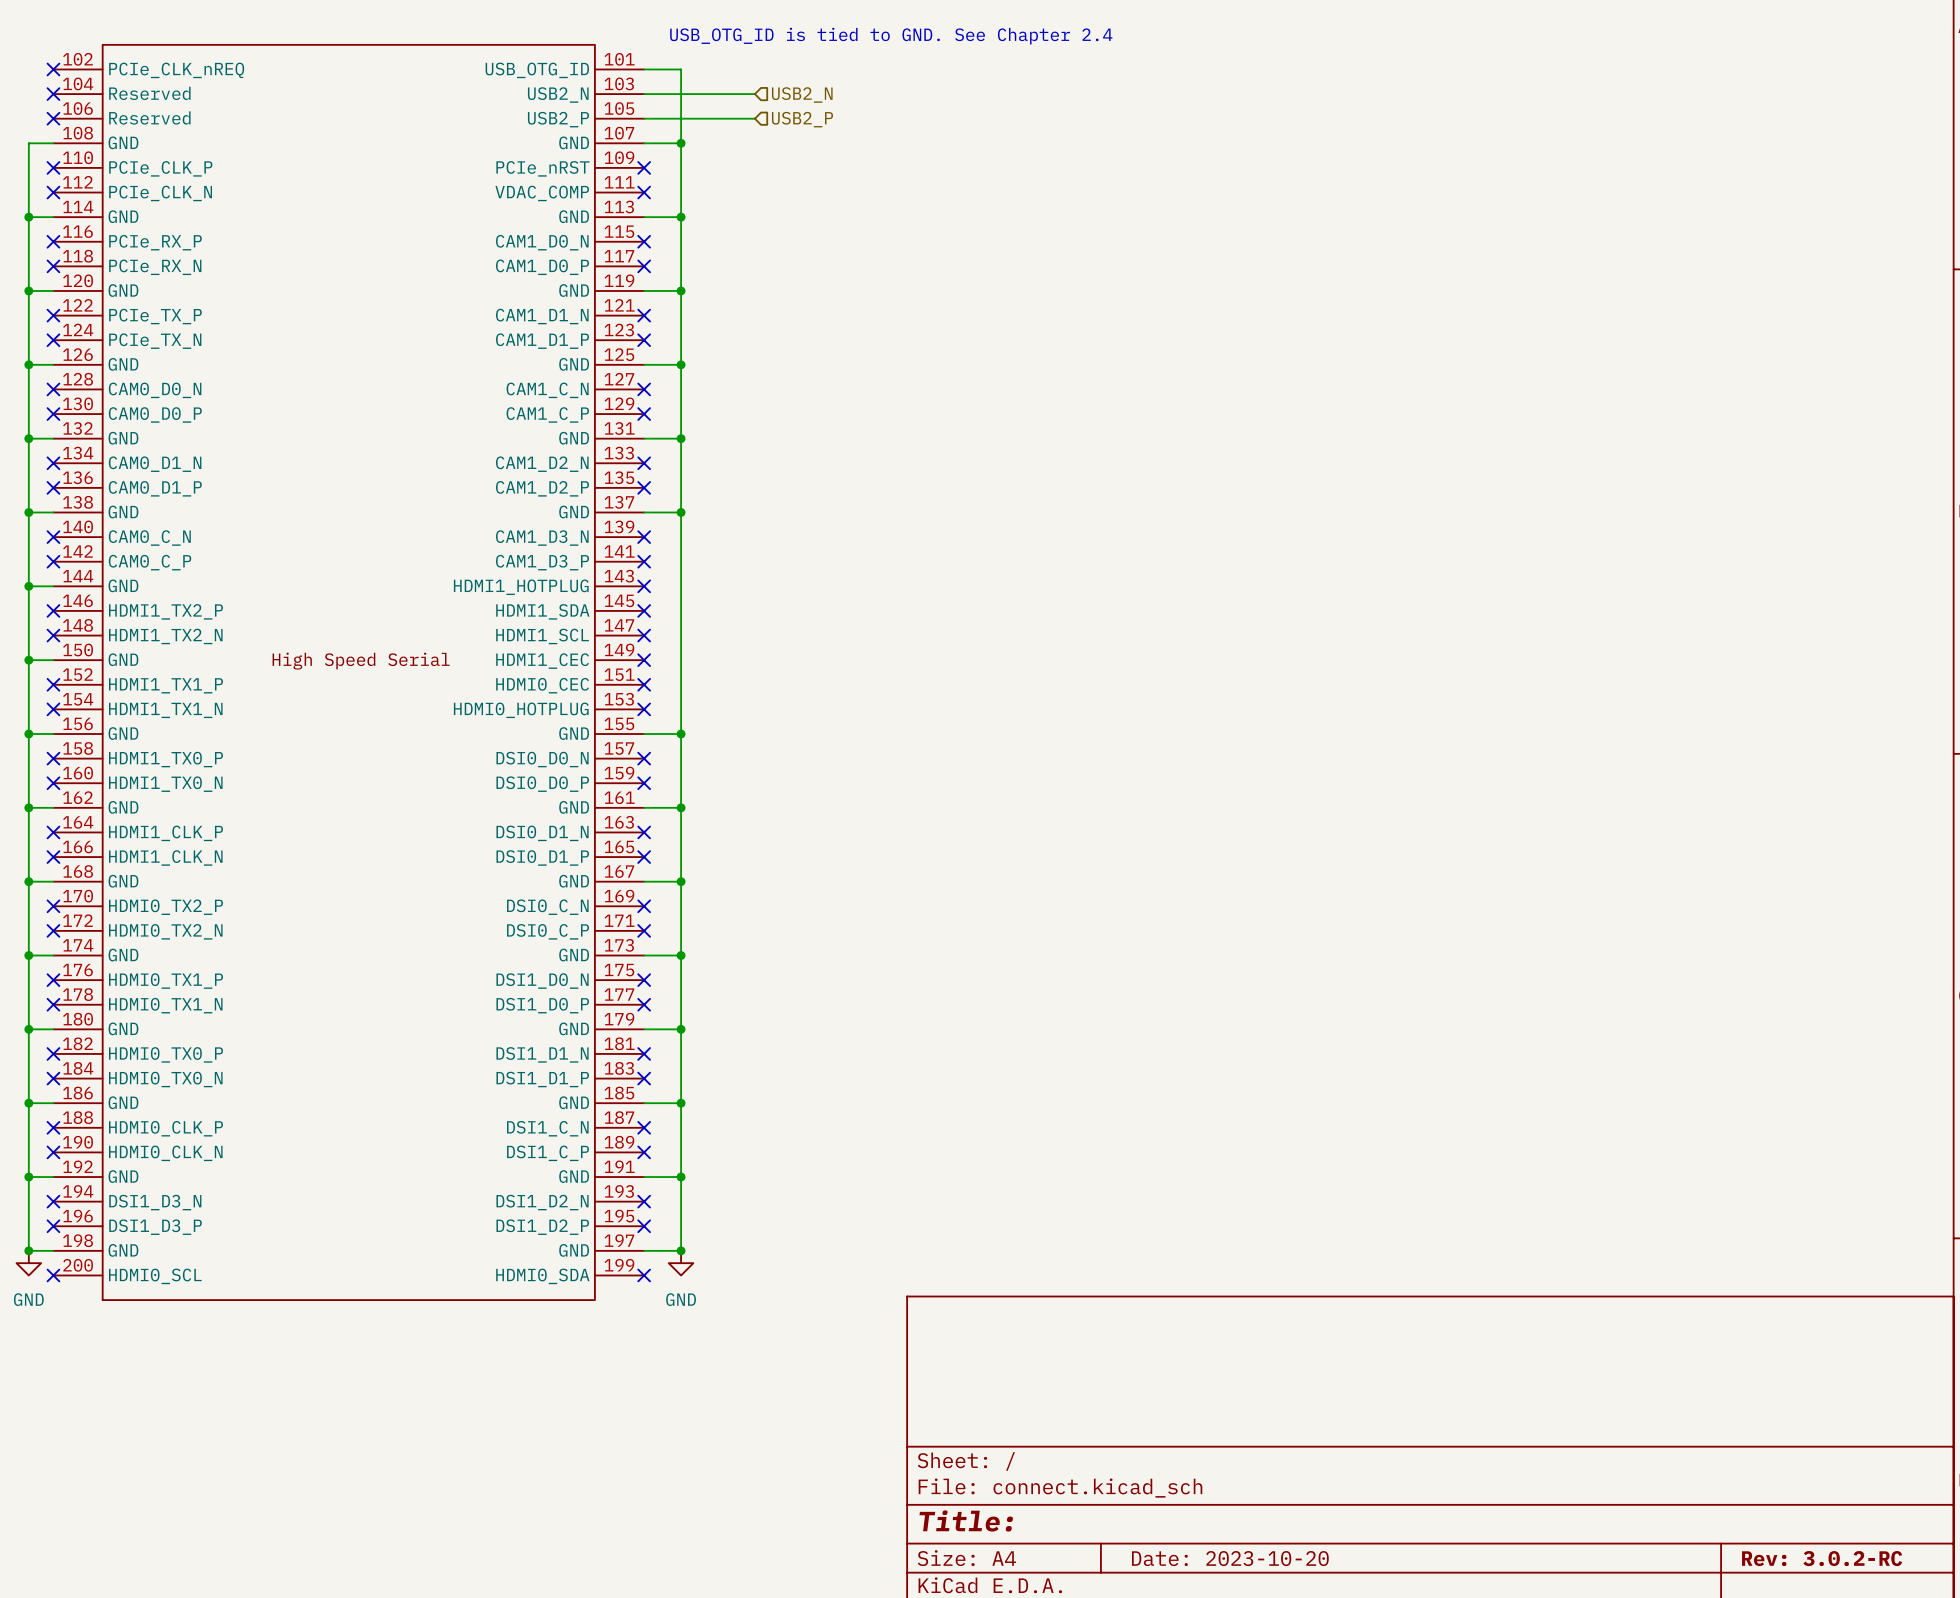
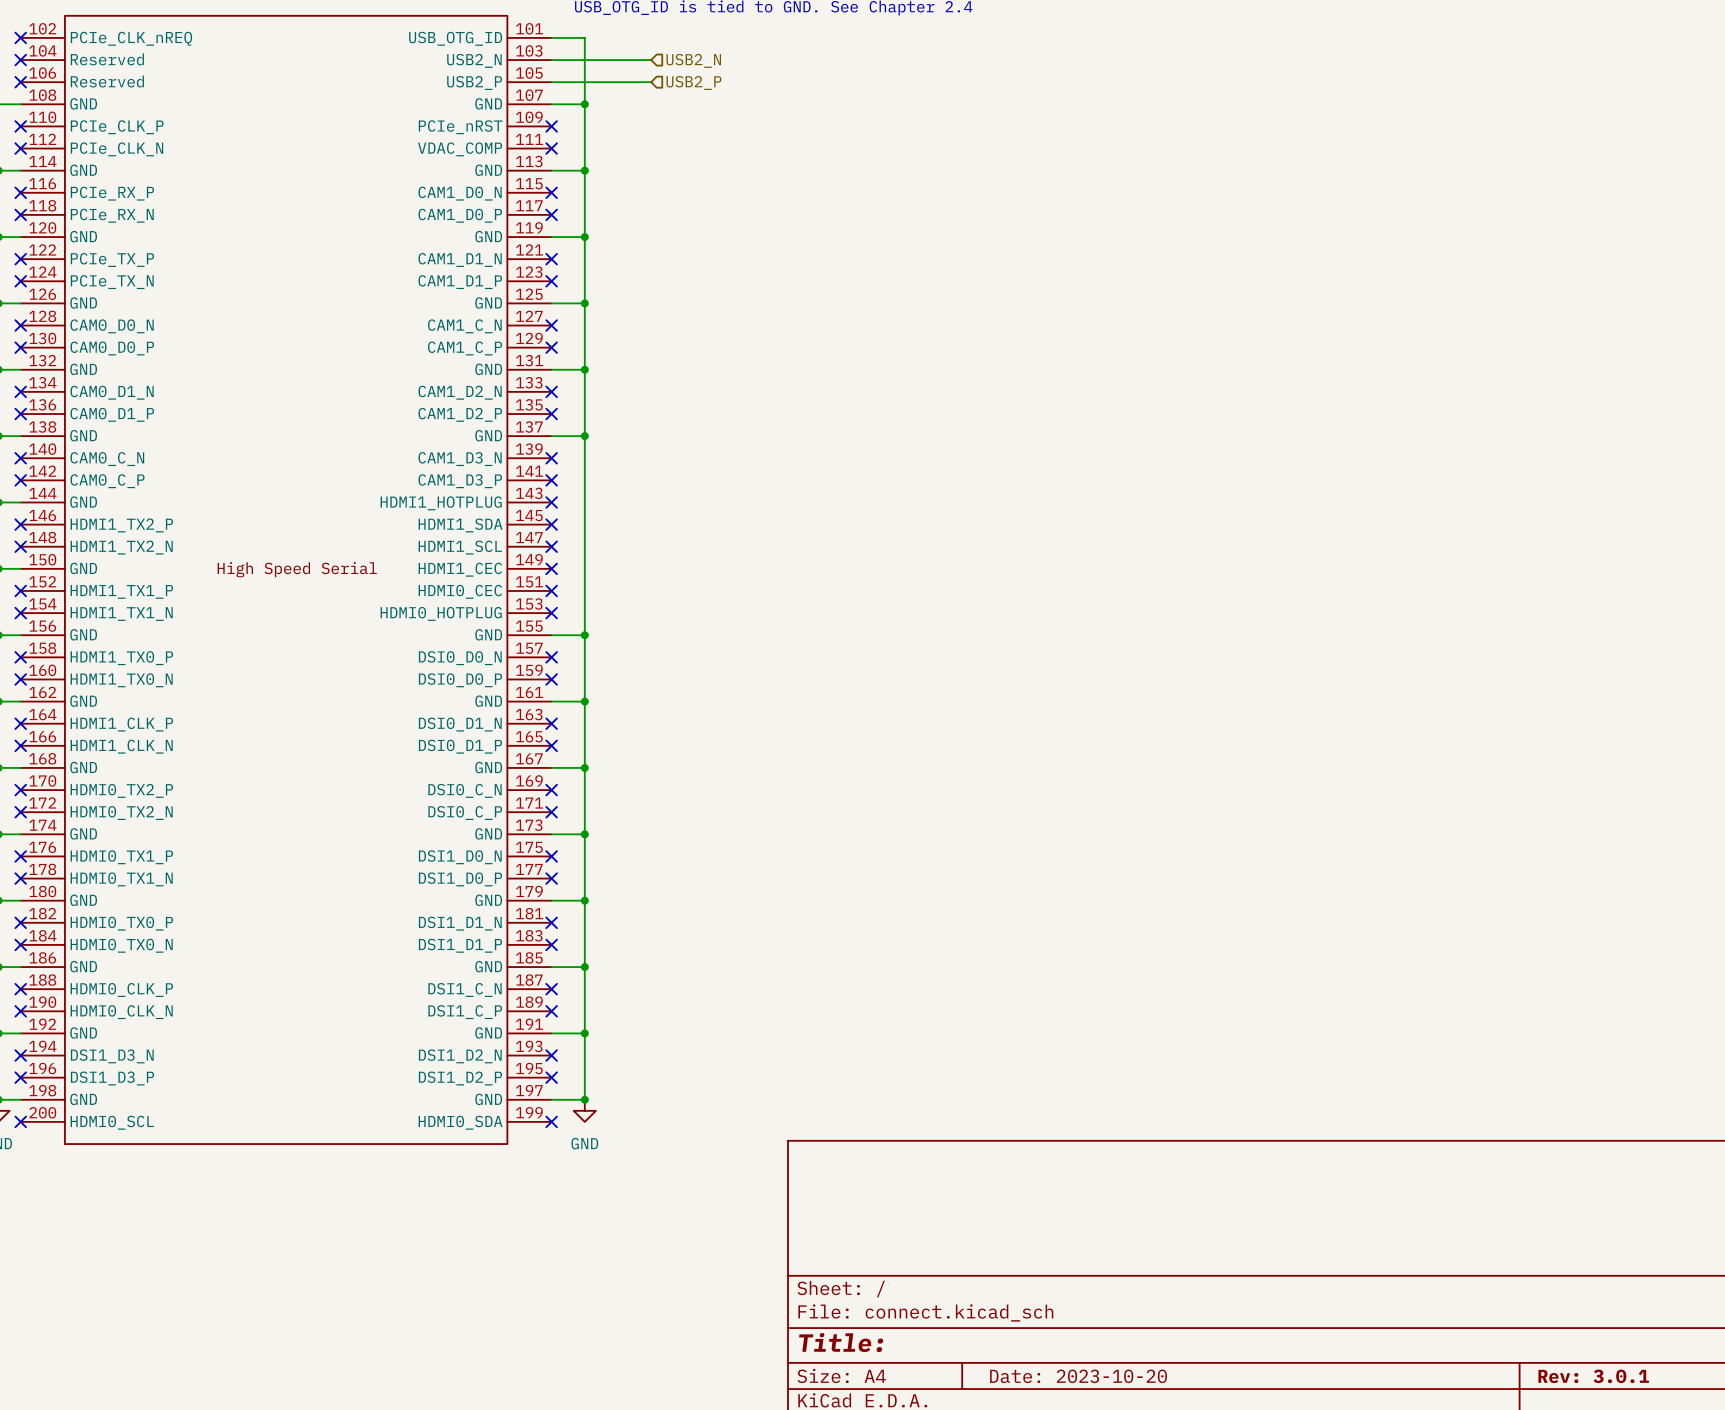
title block: Rev: 3.0.2-RC (1822, 1558) -> Rev: 3.0.1 (1593, 1376)

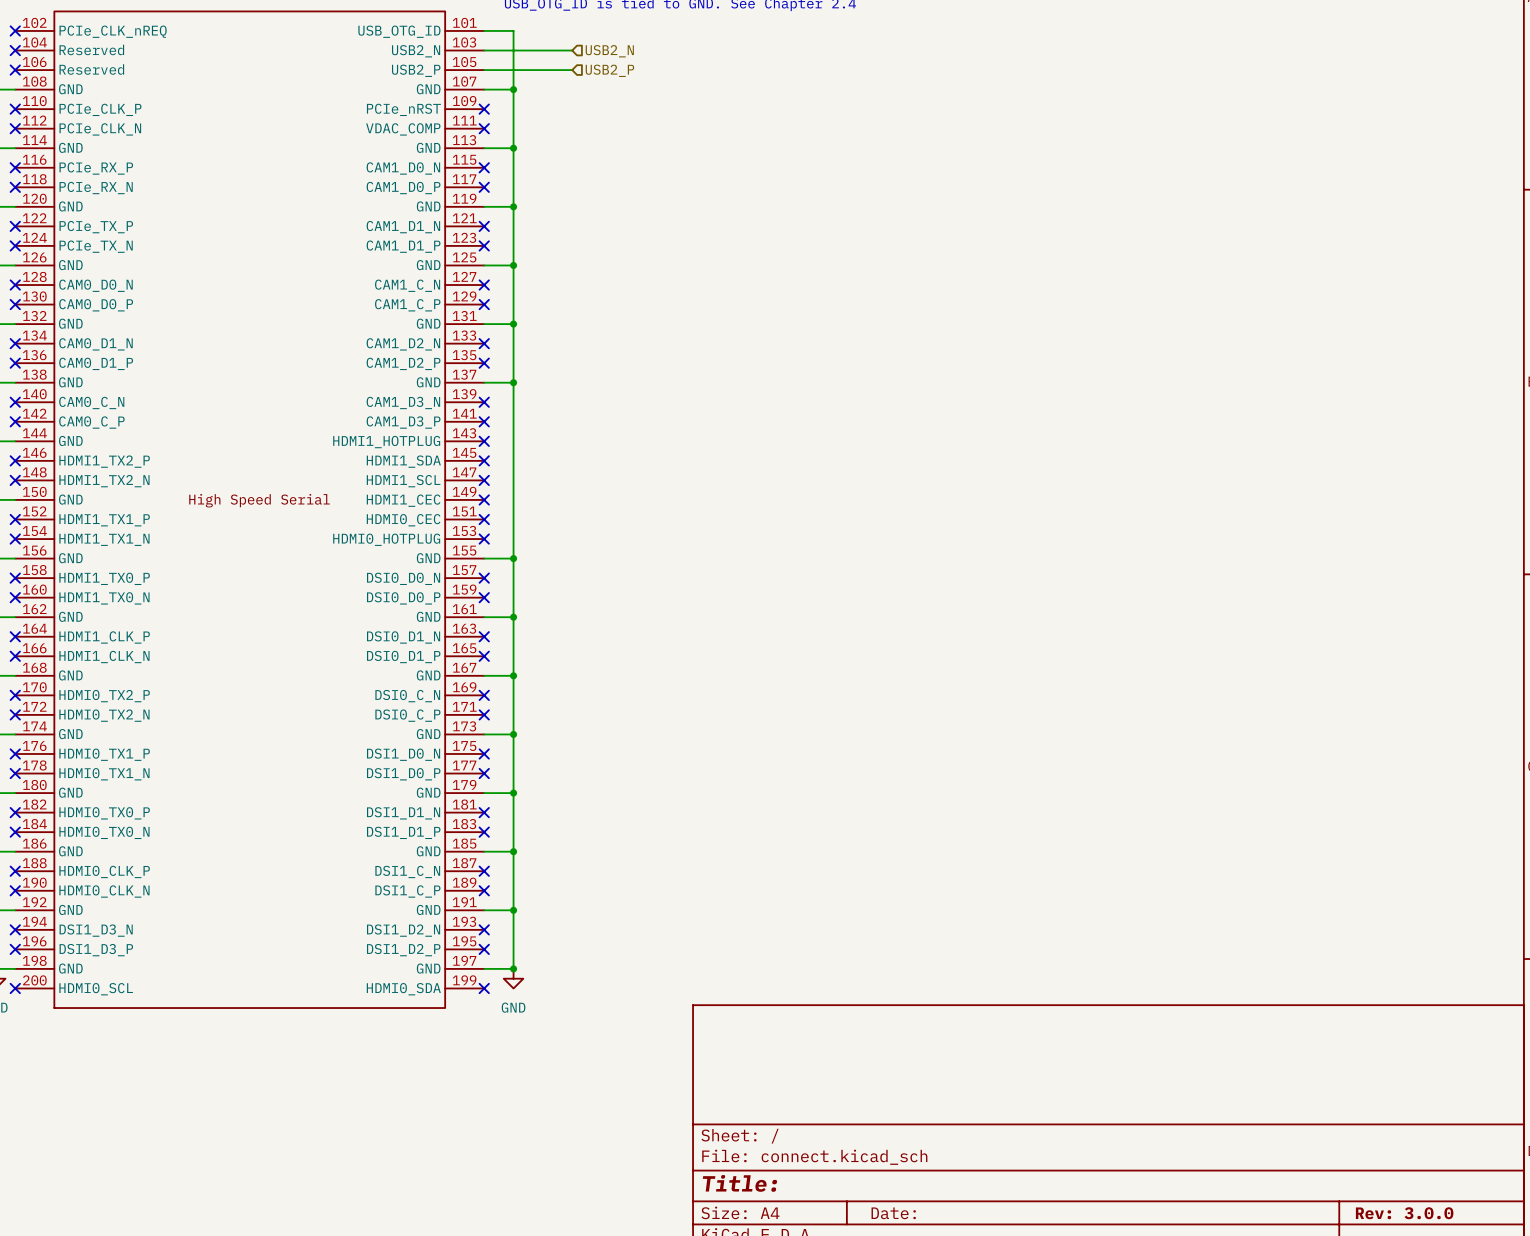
title block: Date: 2023-10-20 (1078, 1376) -> Date: (893, 1213)
title block: Rev: 3.0.1 (1593, 1376) -> Rev: 3.0.0 (1404, 1213)

